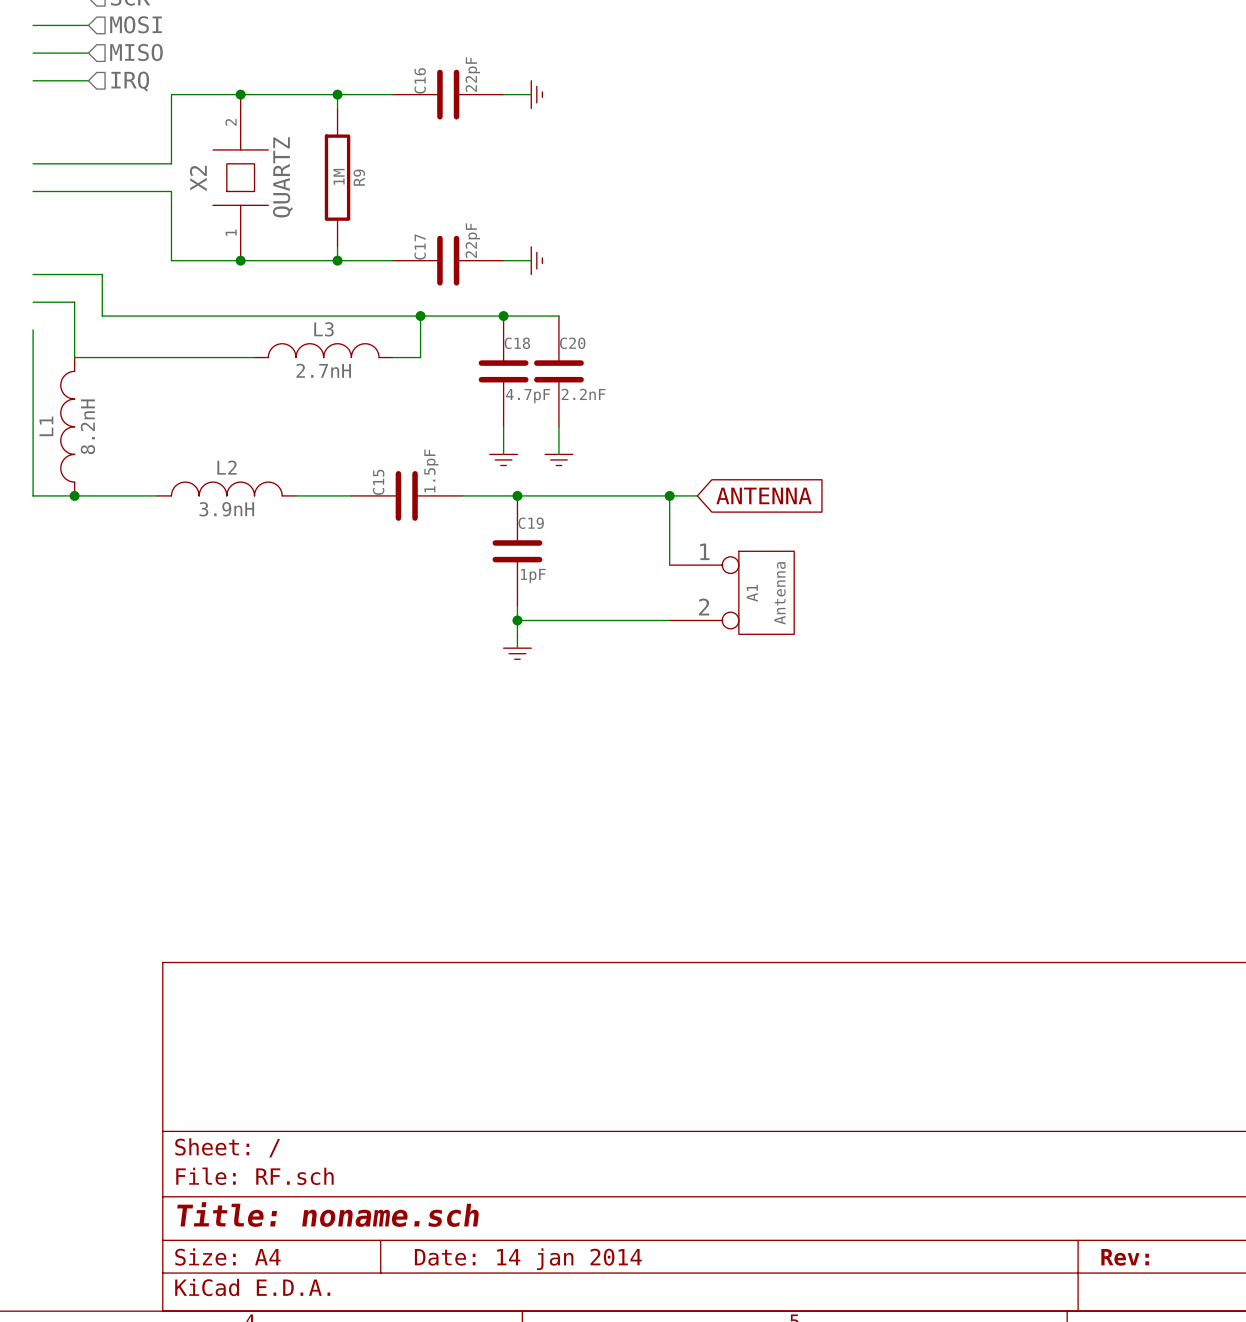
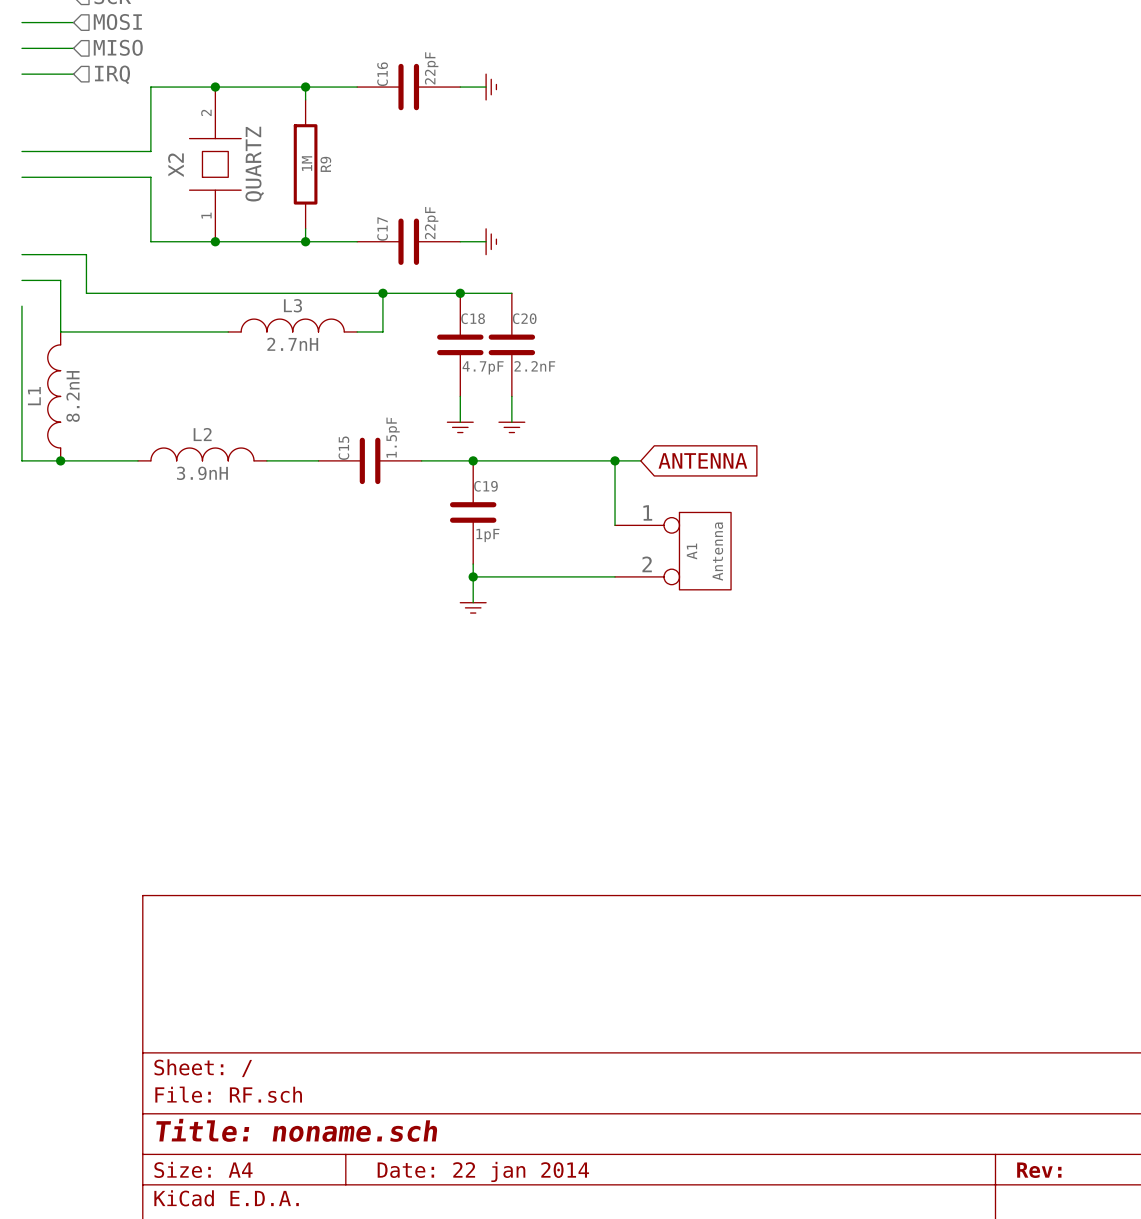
title block: Date: 14 jan 2014 (528, 1259) -> Date: 22 jan 2014 (483, 1171)

